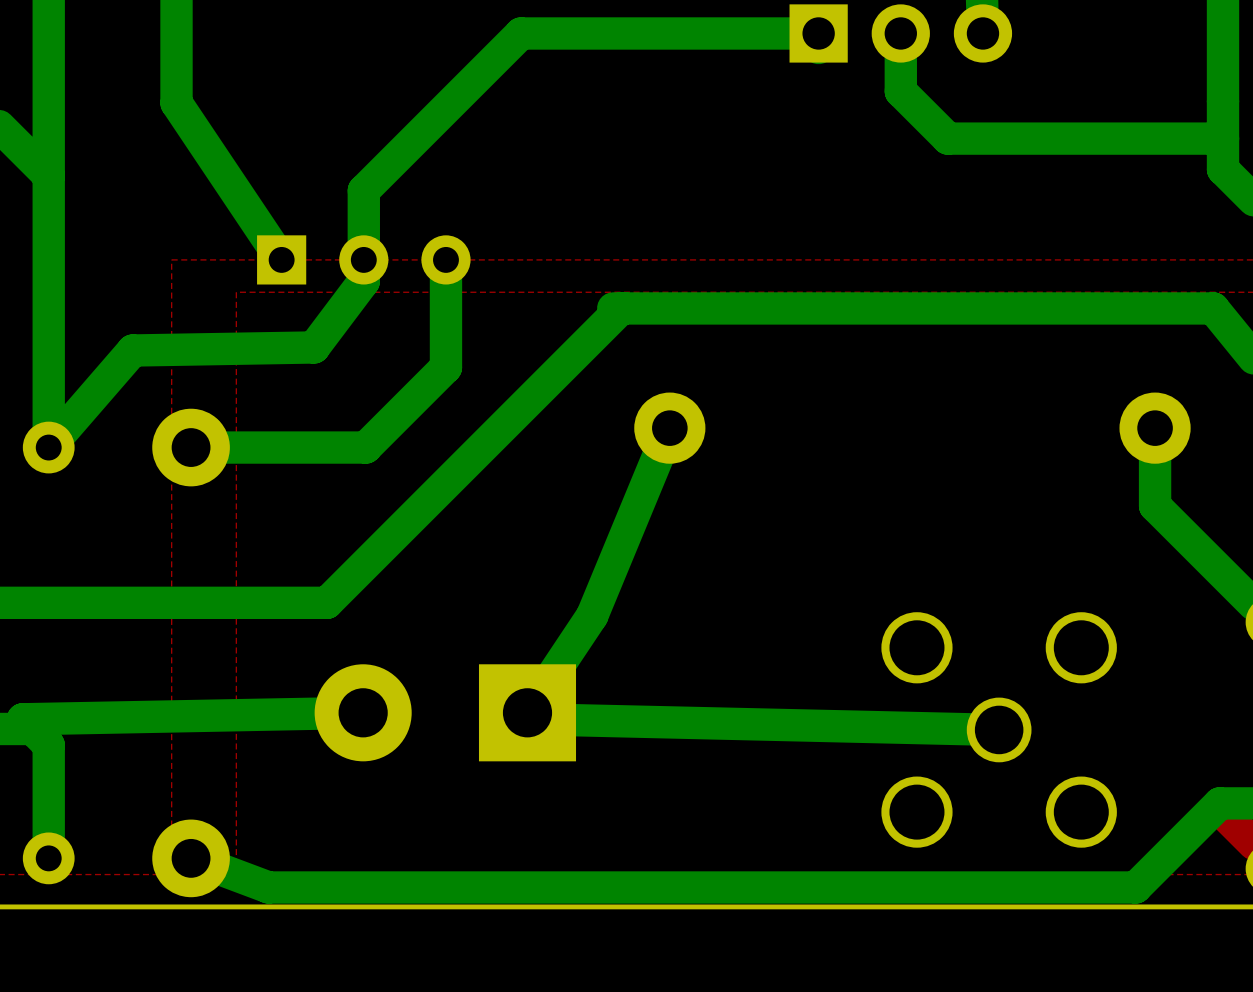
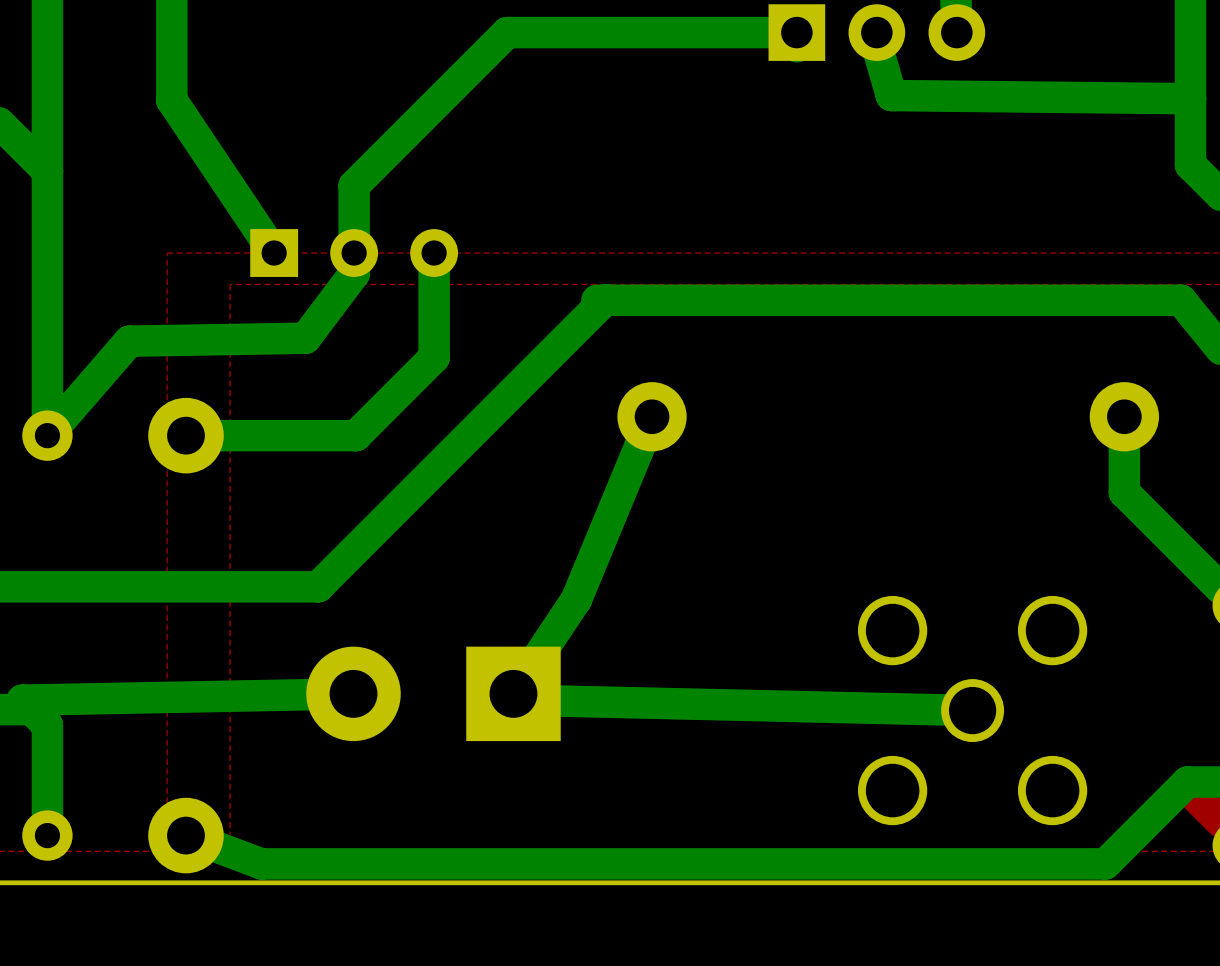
bottom track: (900, 46) (900, 91) (948, 138) (1223, 138) -> (876, 45) (891, 95) (1190, 98)

